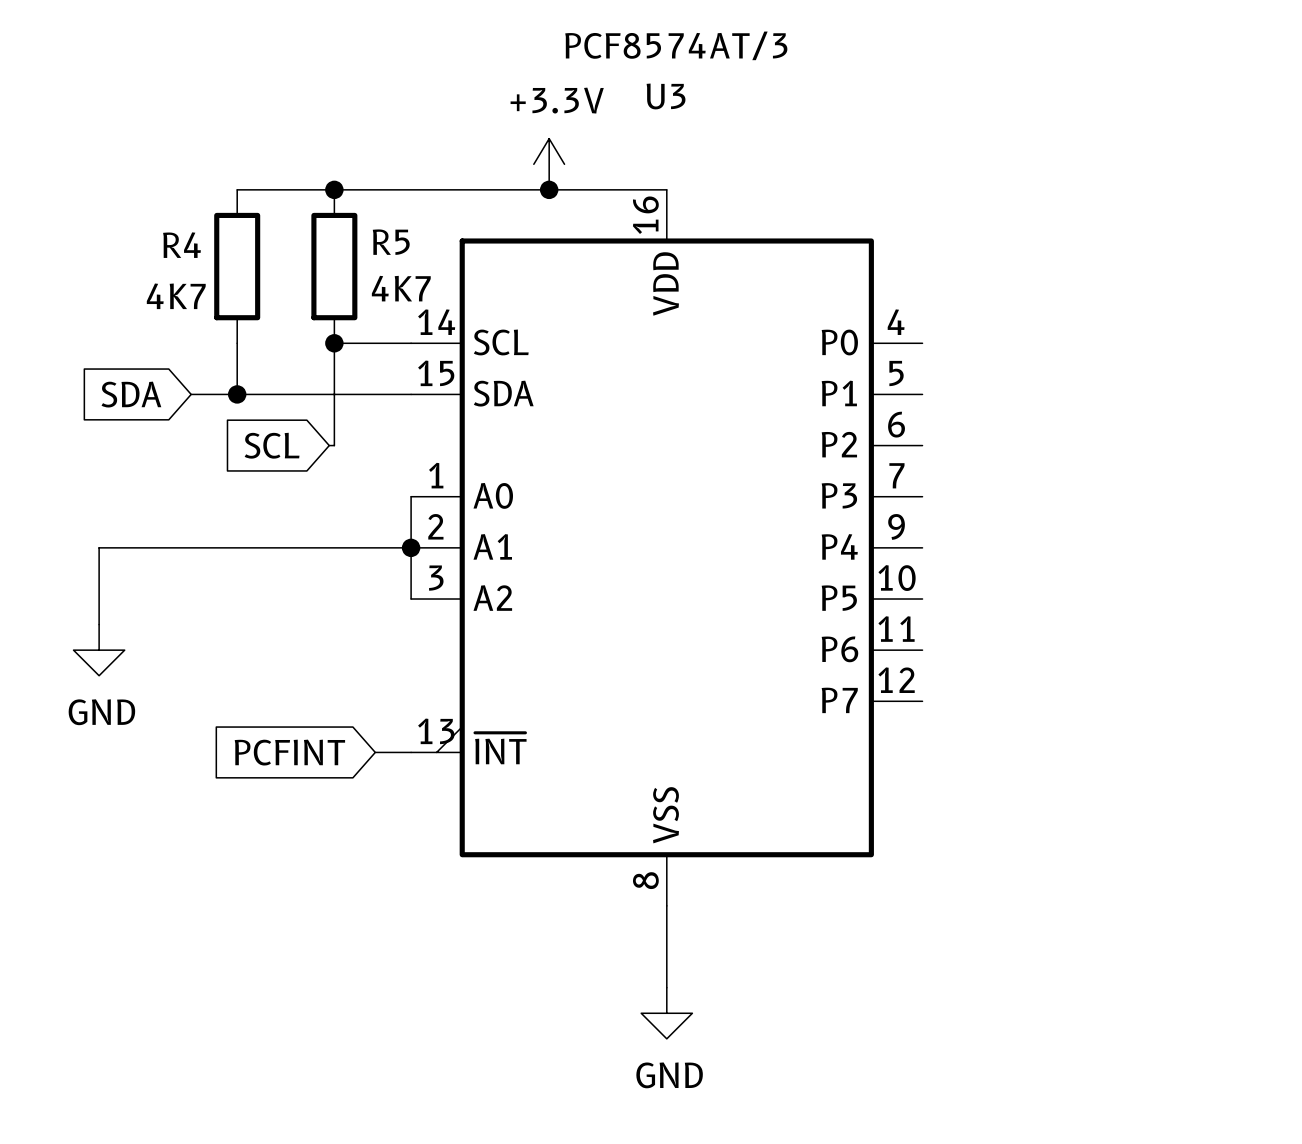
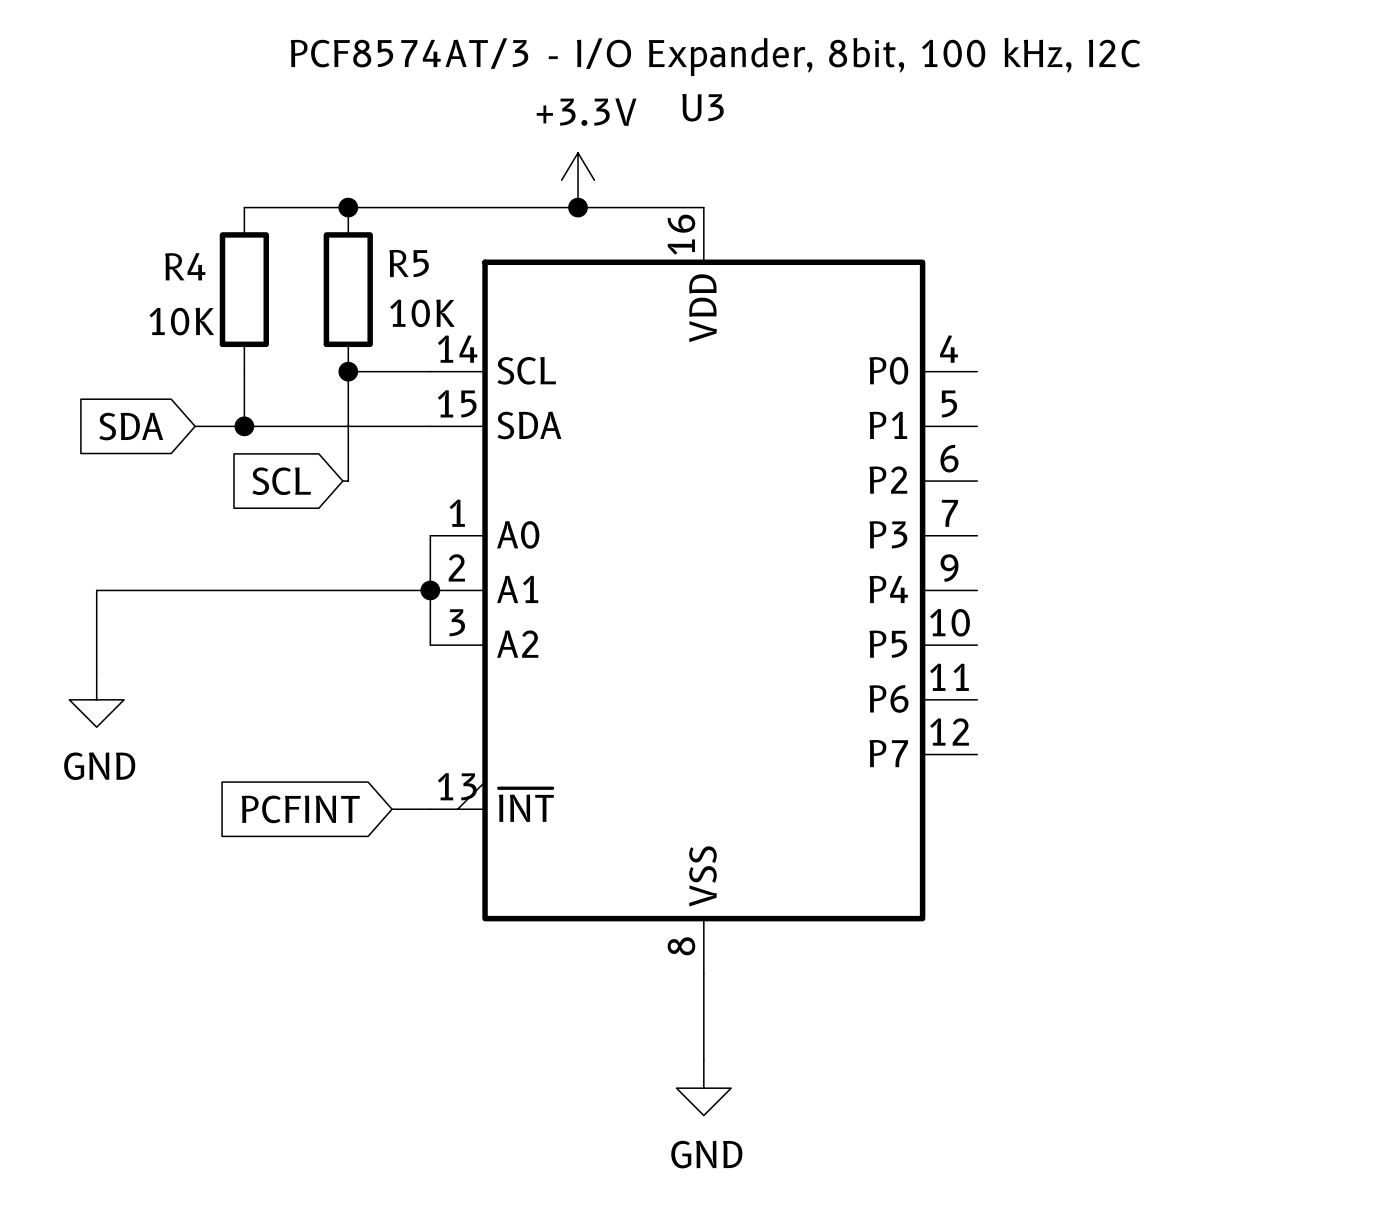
U3 value: PCF8574AT/3 (676, 45) -> PCF8574AT/3 - I/O Expander, 8bit, 100 kHz, I2C (715, 57)
R5 value: 4K7 (401, 288) -> 10K (422, 313)
R4 value: 4K7 (176, 296) -> 10K (181, 321)

